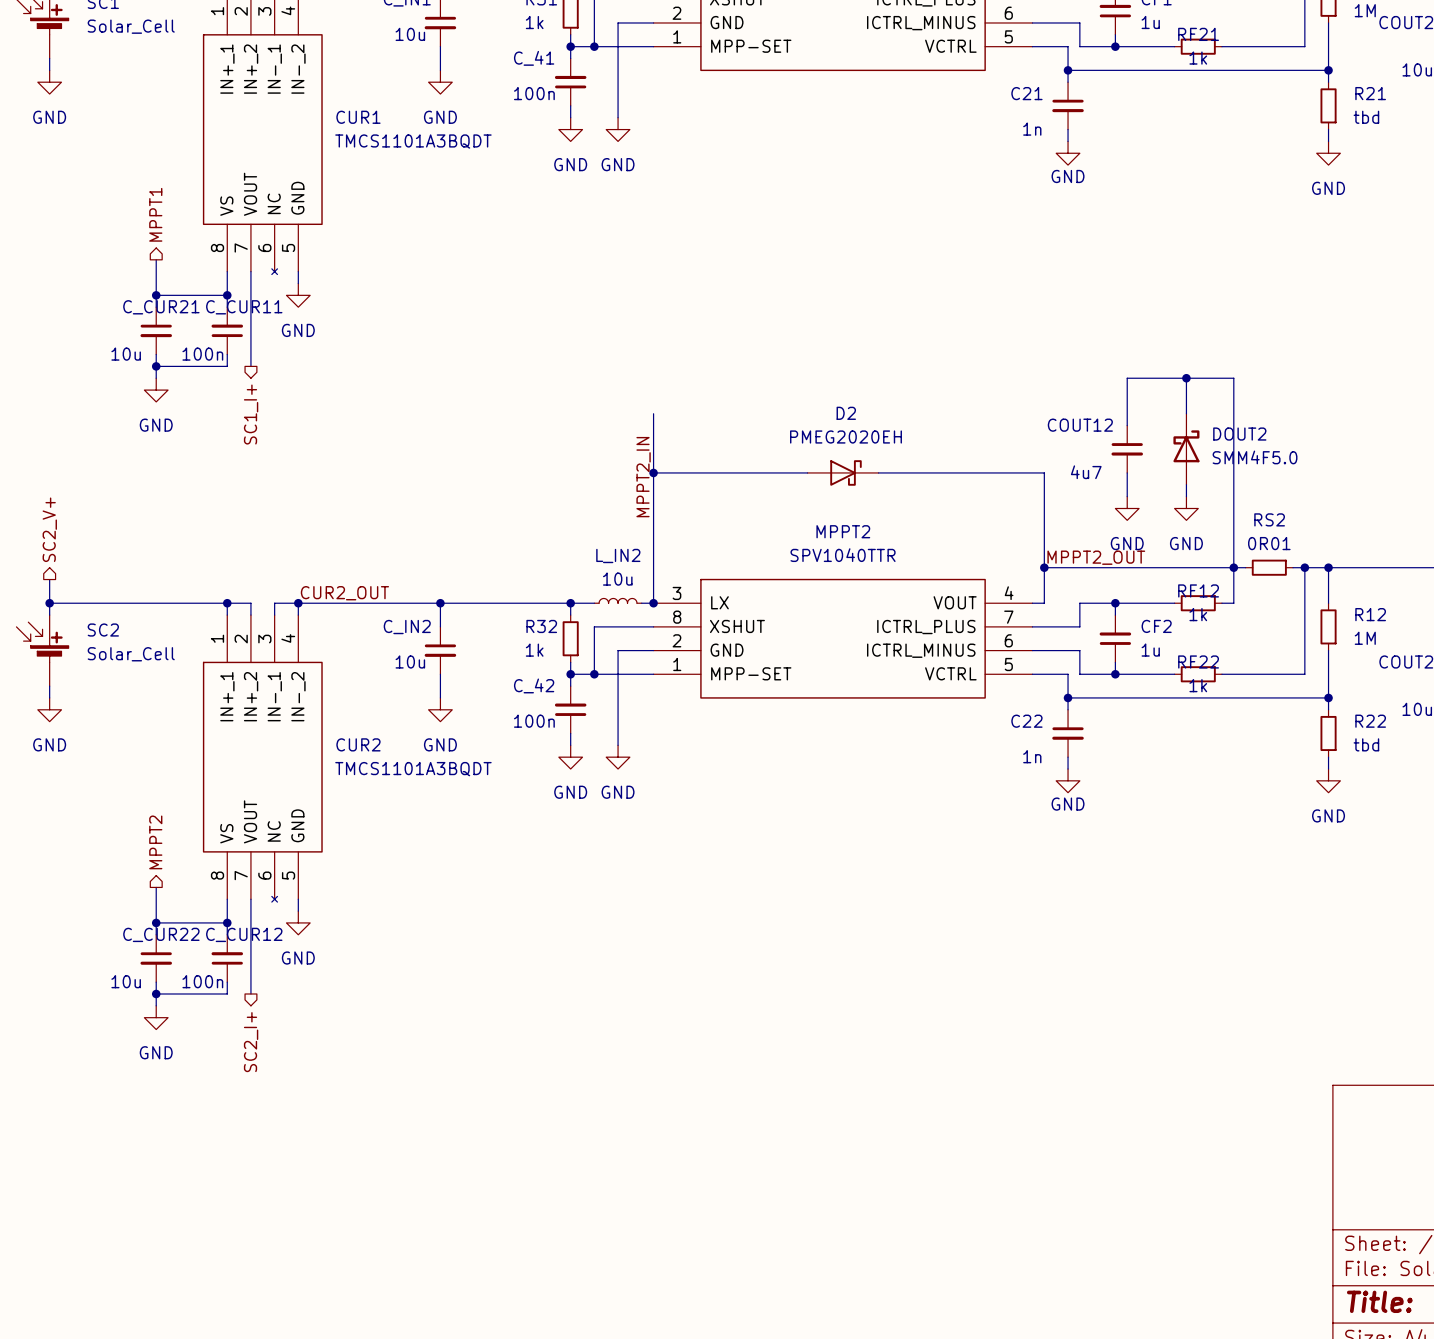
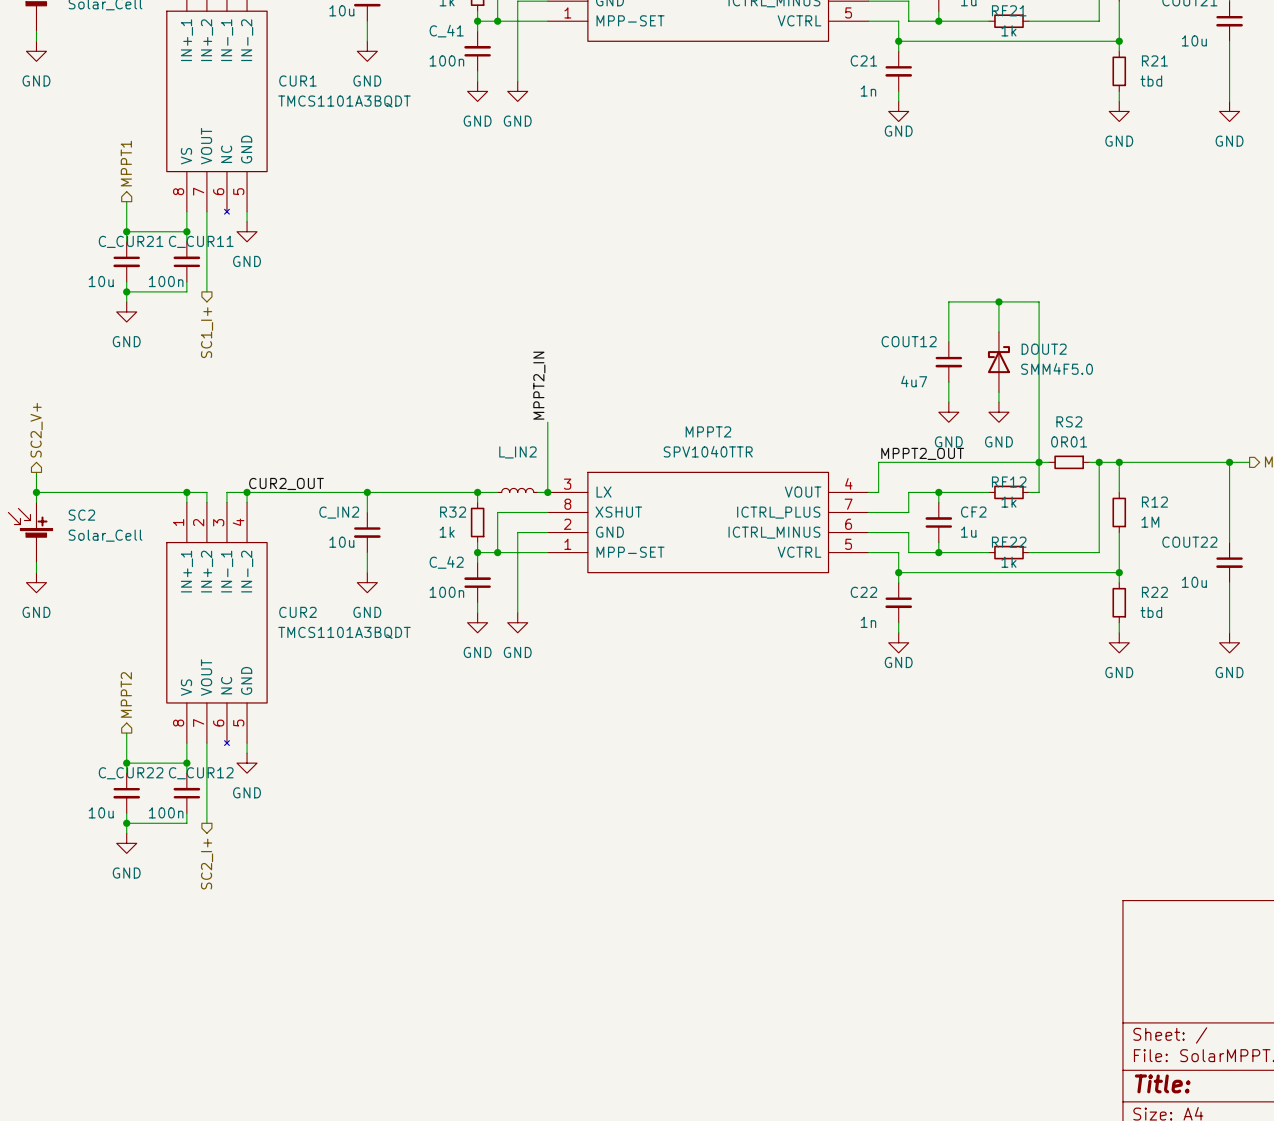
wire: (653, 413) (653, 520) -> none
wire: (653, 472) (807, 472) -> none
junction: (653, 472) -> none
D2: PMEG2020EH (843, 472) -> none
wire: (878, 472) (1044, 472) (1044, 567) -> none
junction: (1044, 567) -> none
L_IN2 value: 10u (617, 579) -> none

